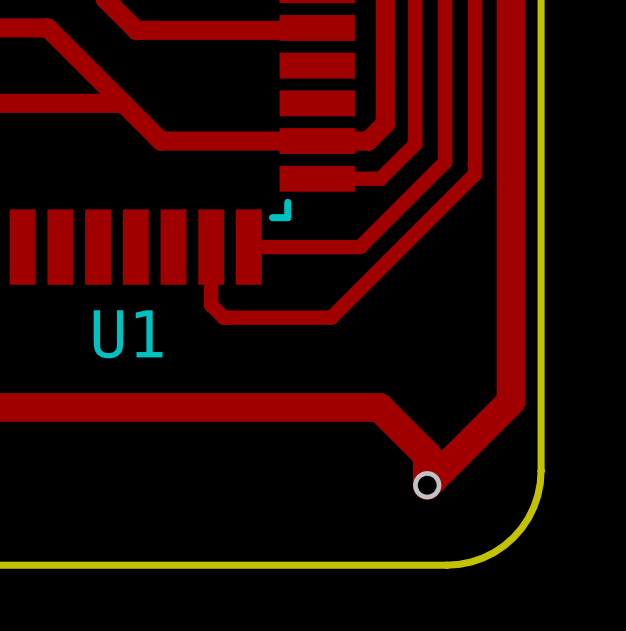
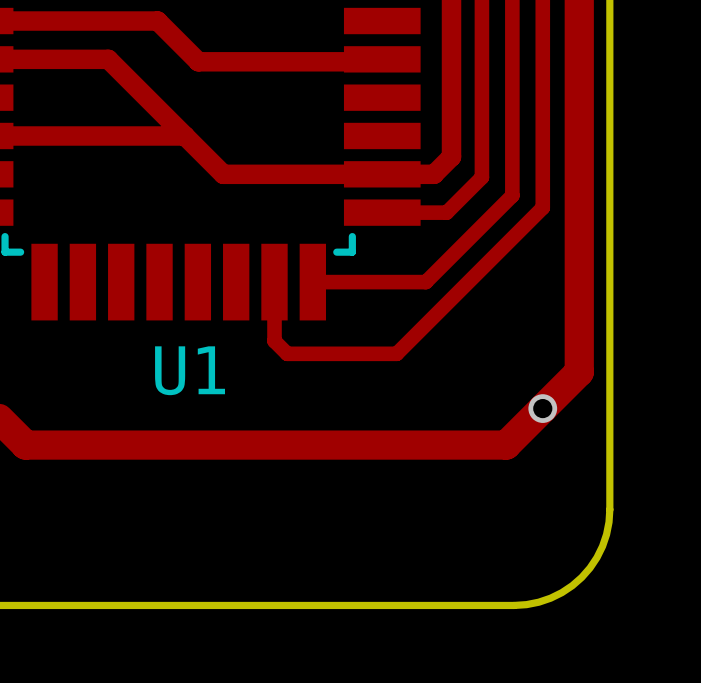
track: (511, 335) (511, 401) (427, 485) (427, 455) (379, 407) -> (579, 372) (506, 445) (445, 445)
via position: (427, 485) -> (542, 408)

